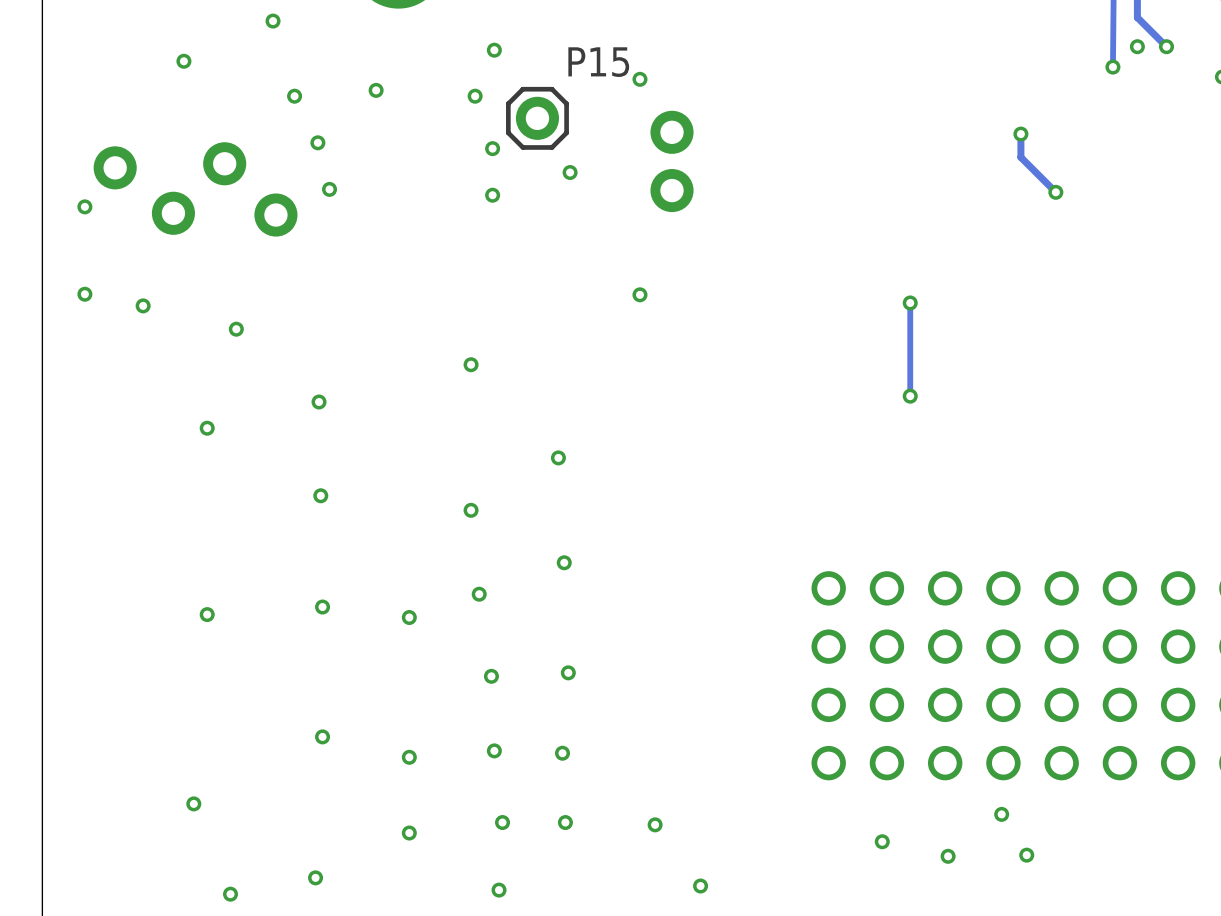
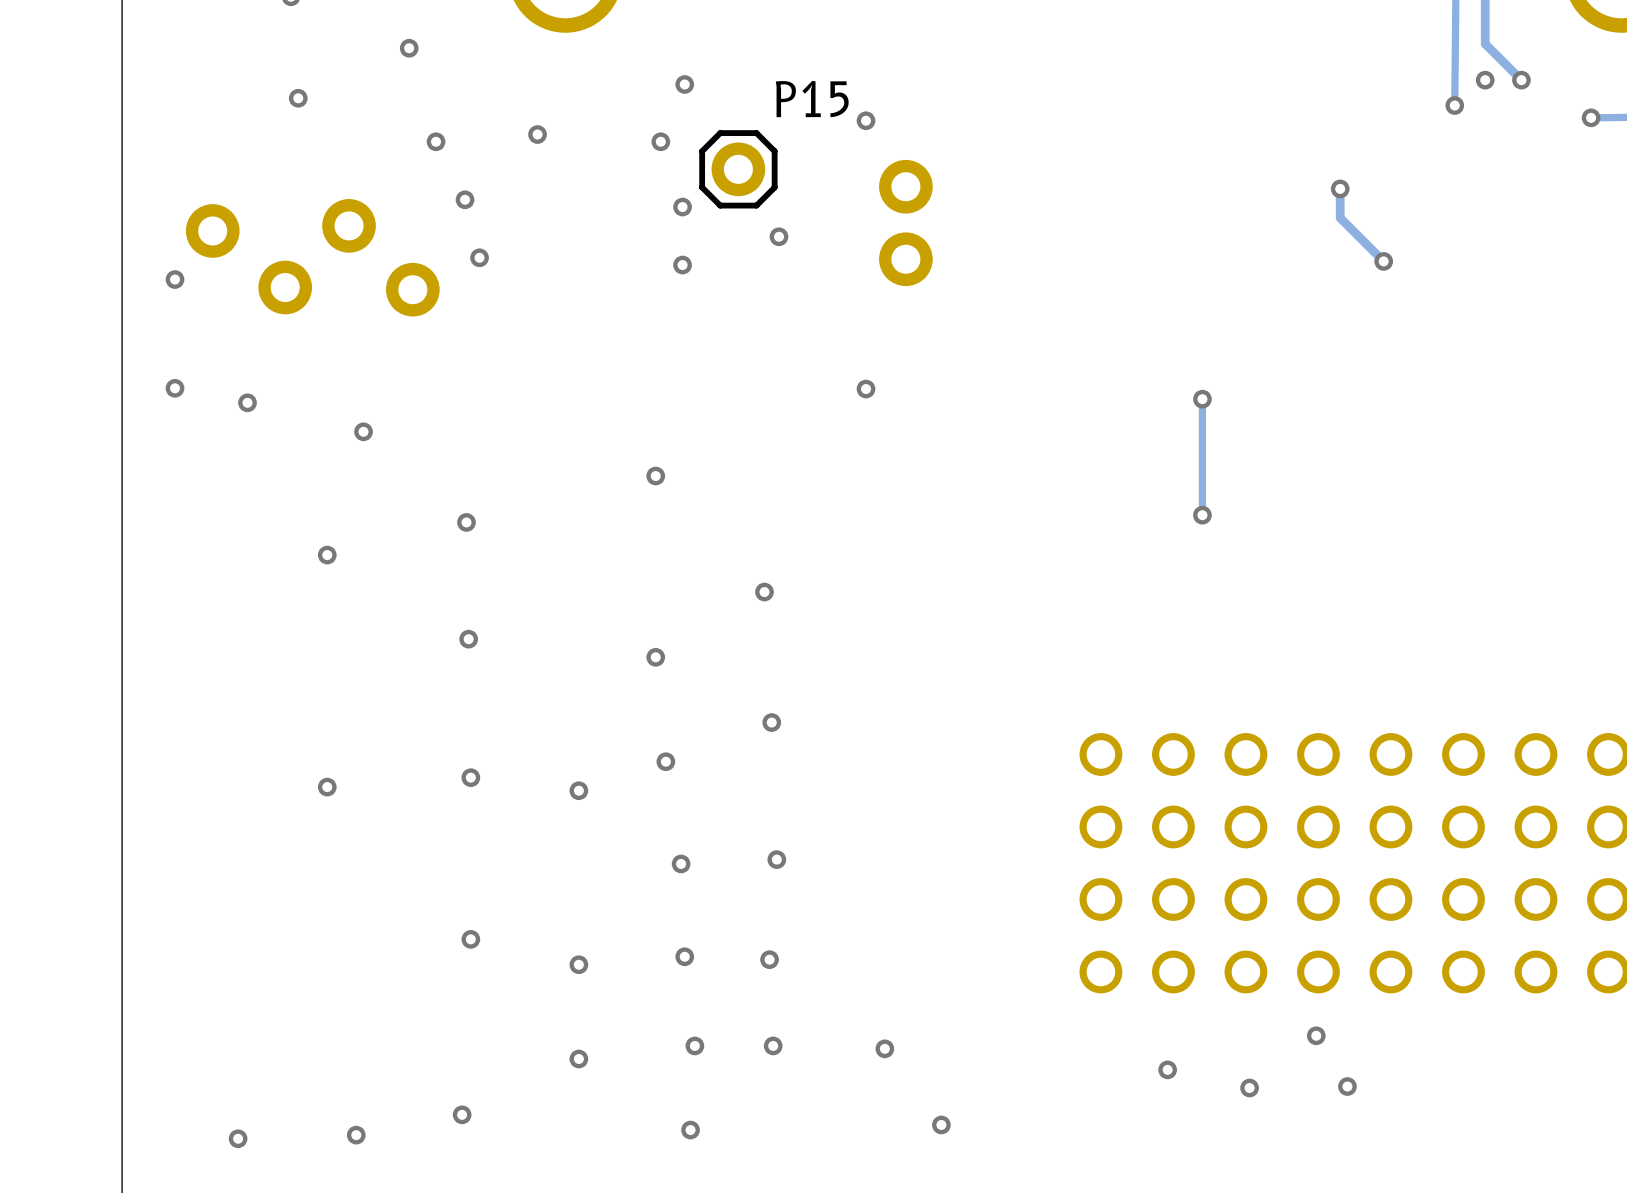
via position: (193, 803) -> (238, 1138)

